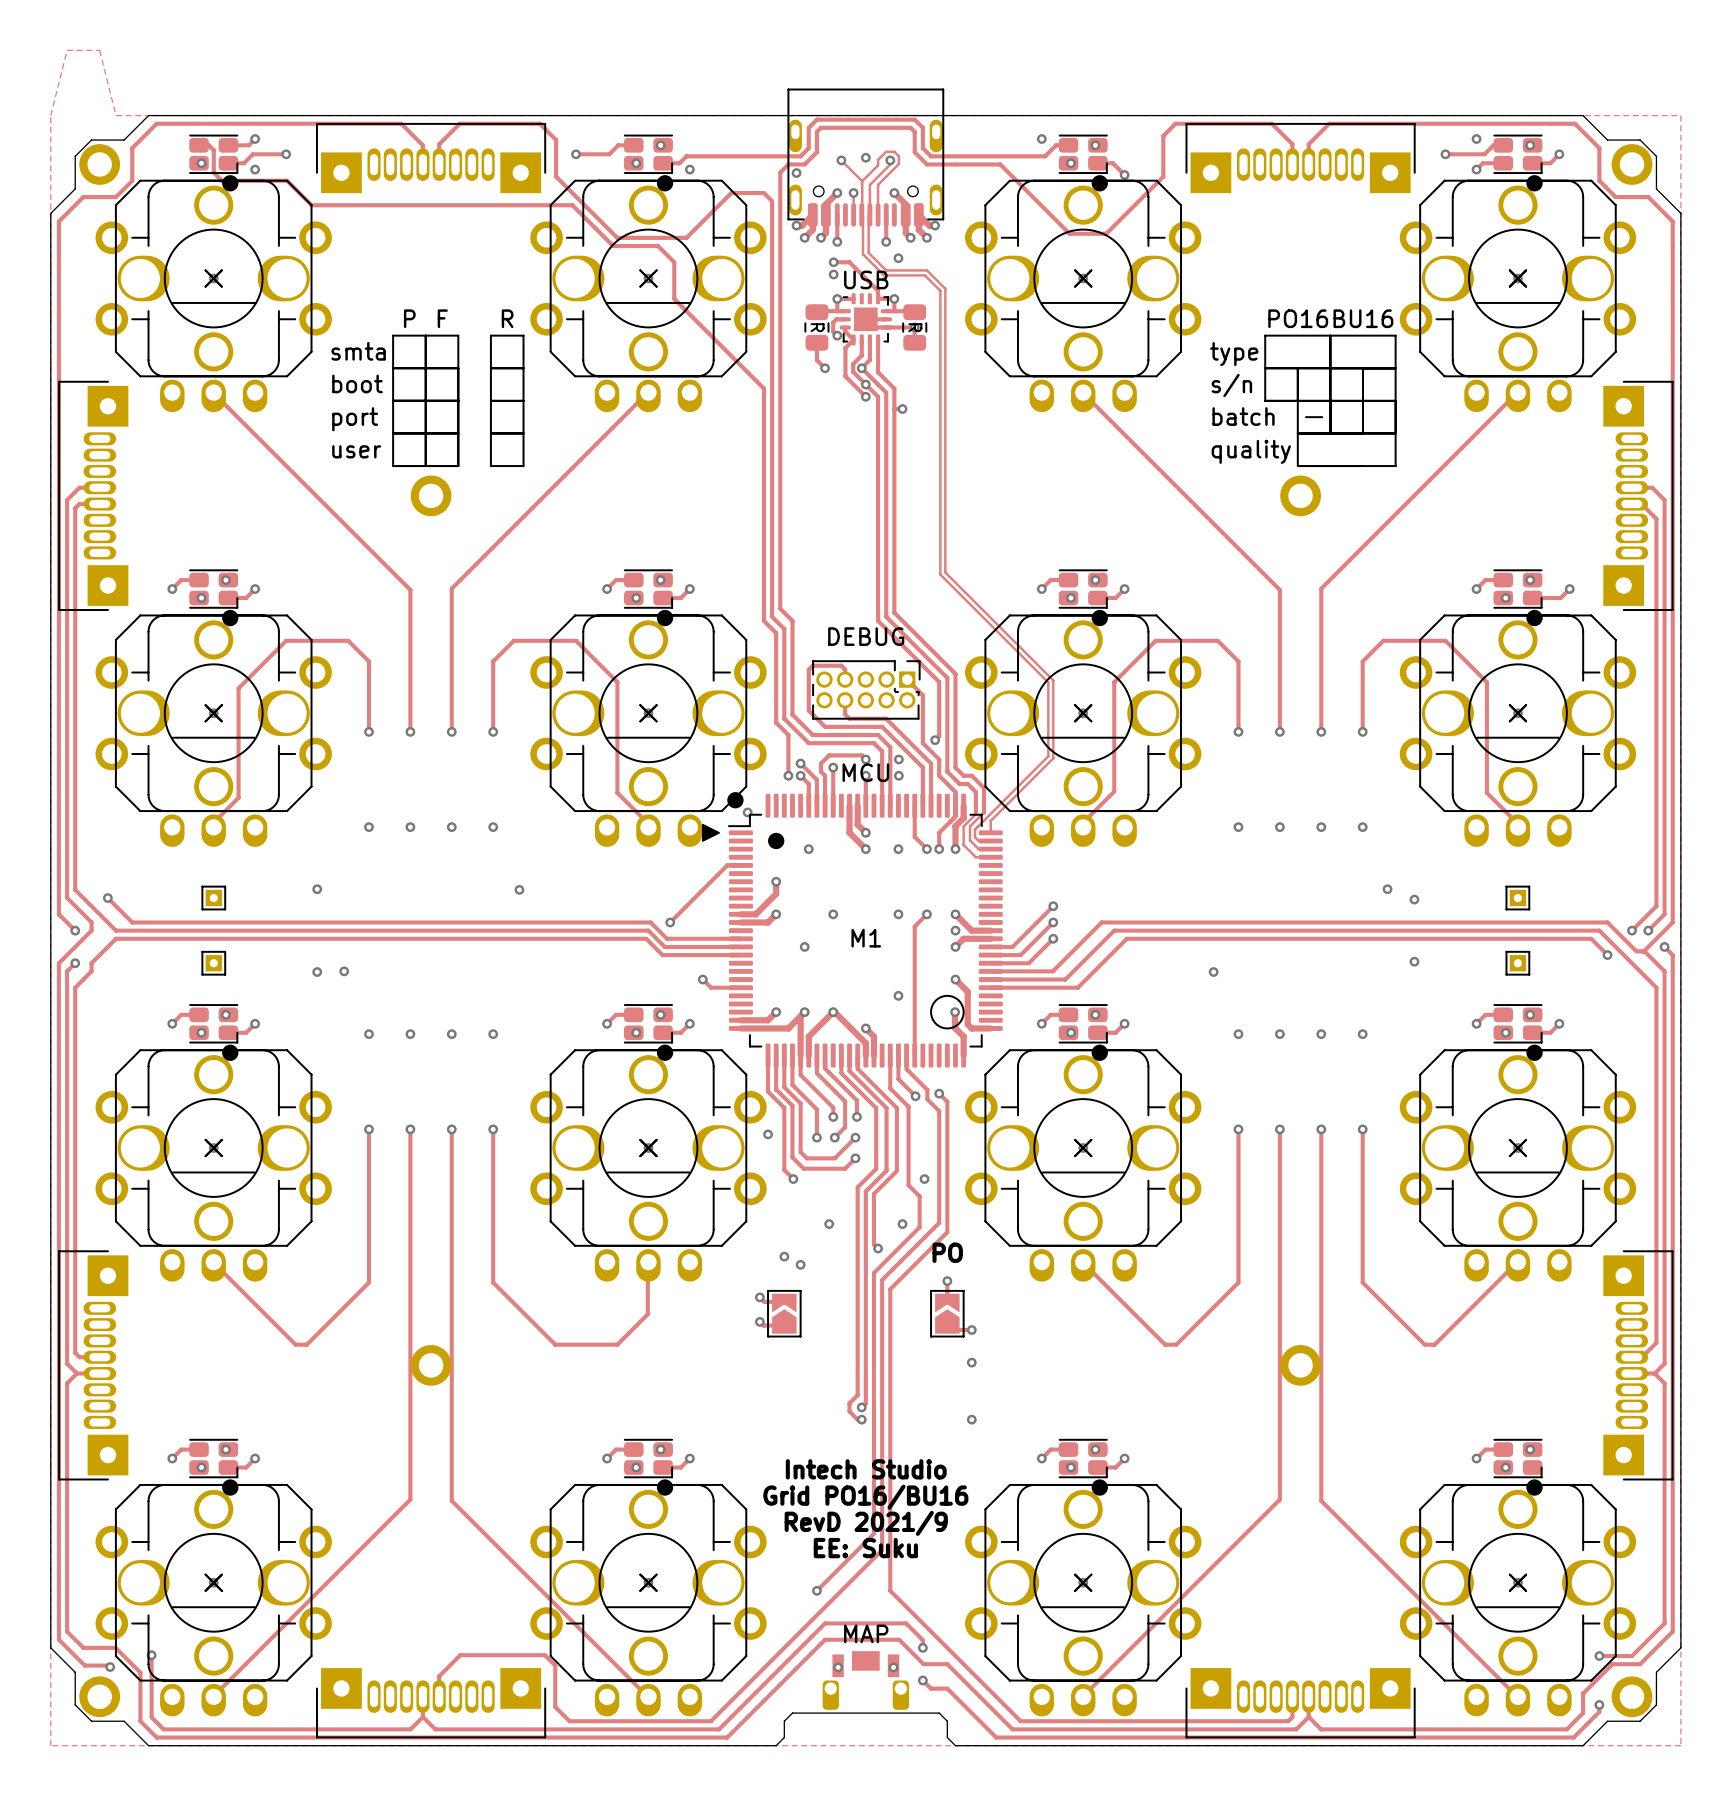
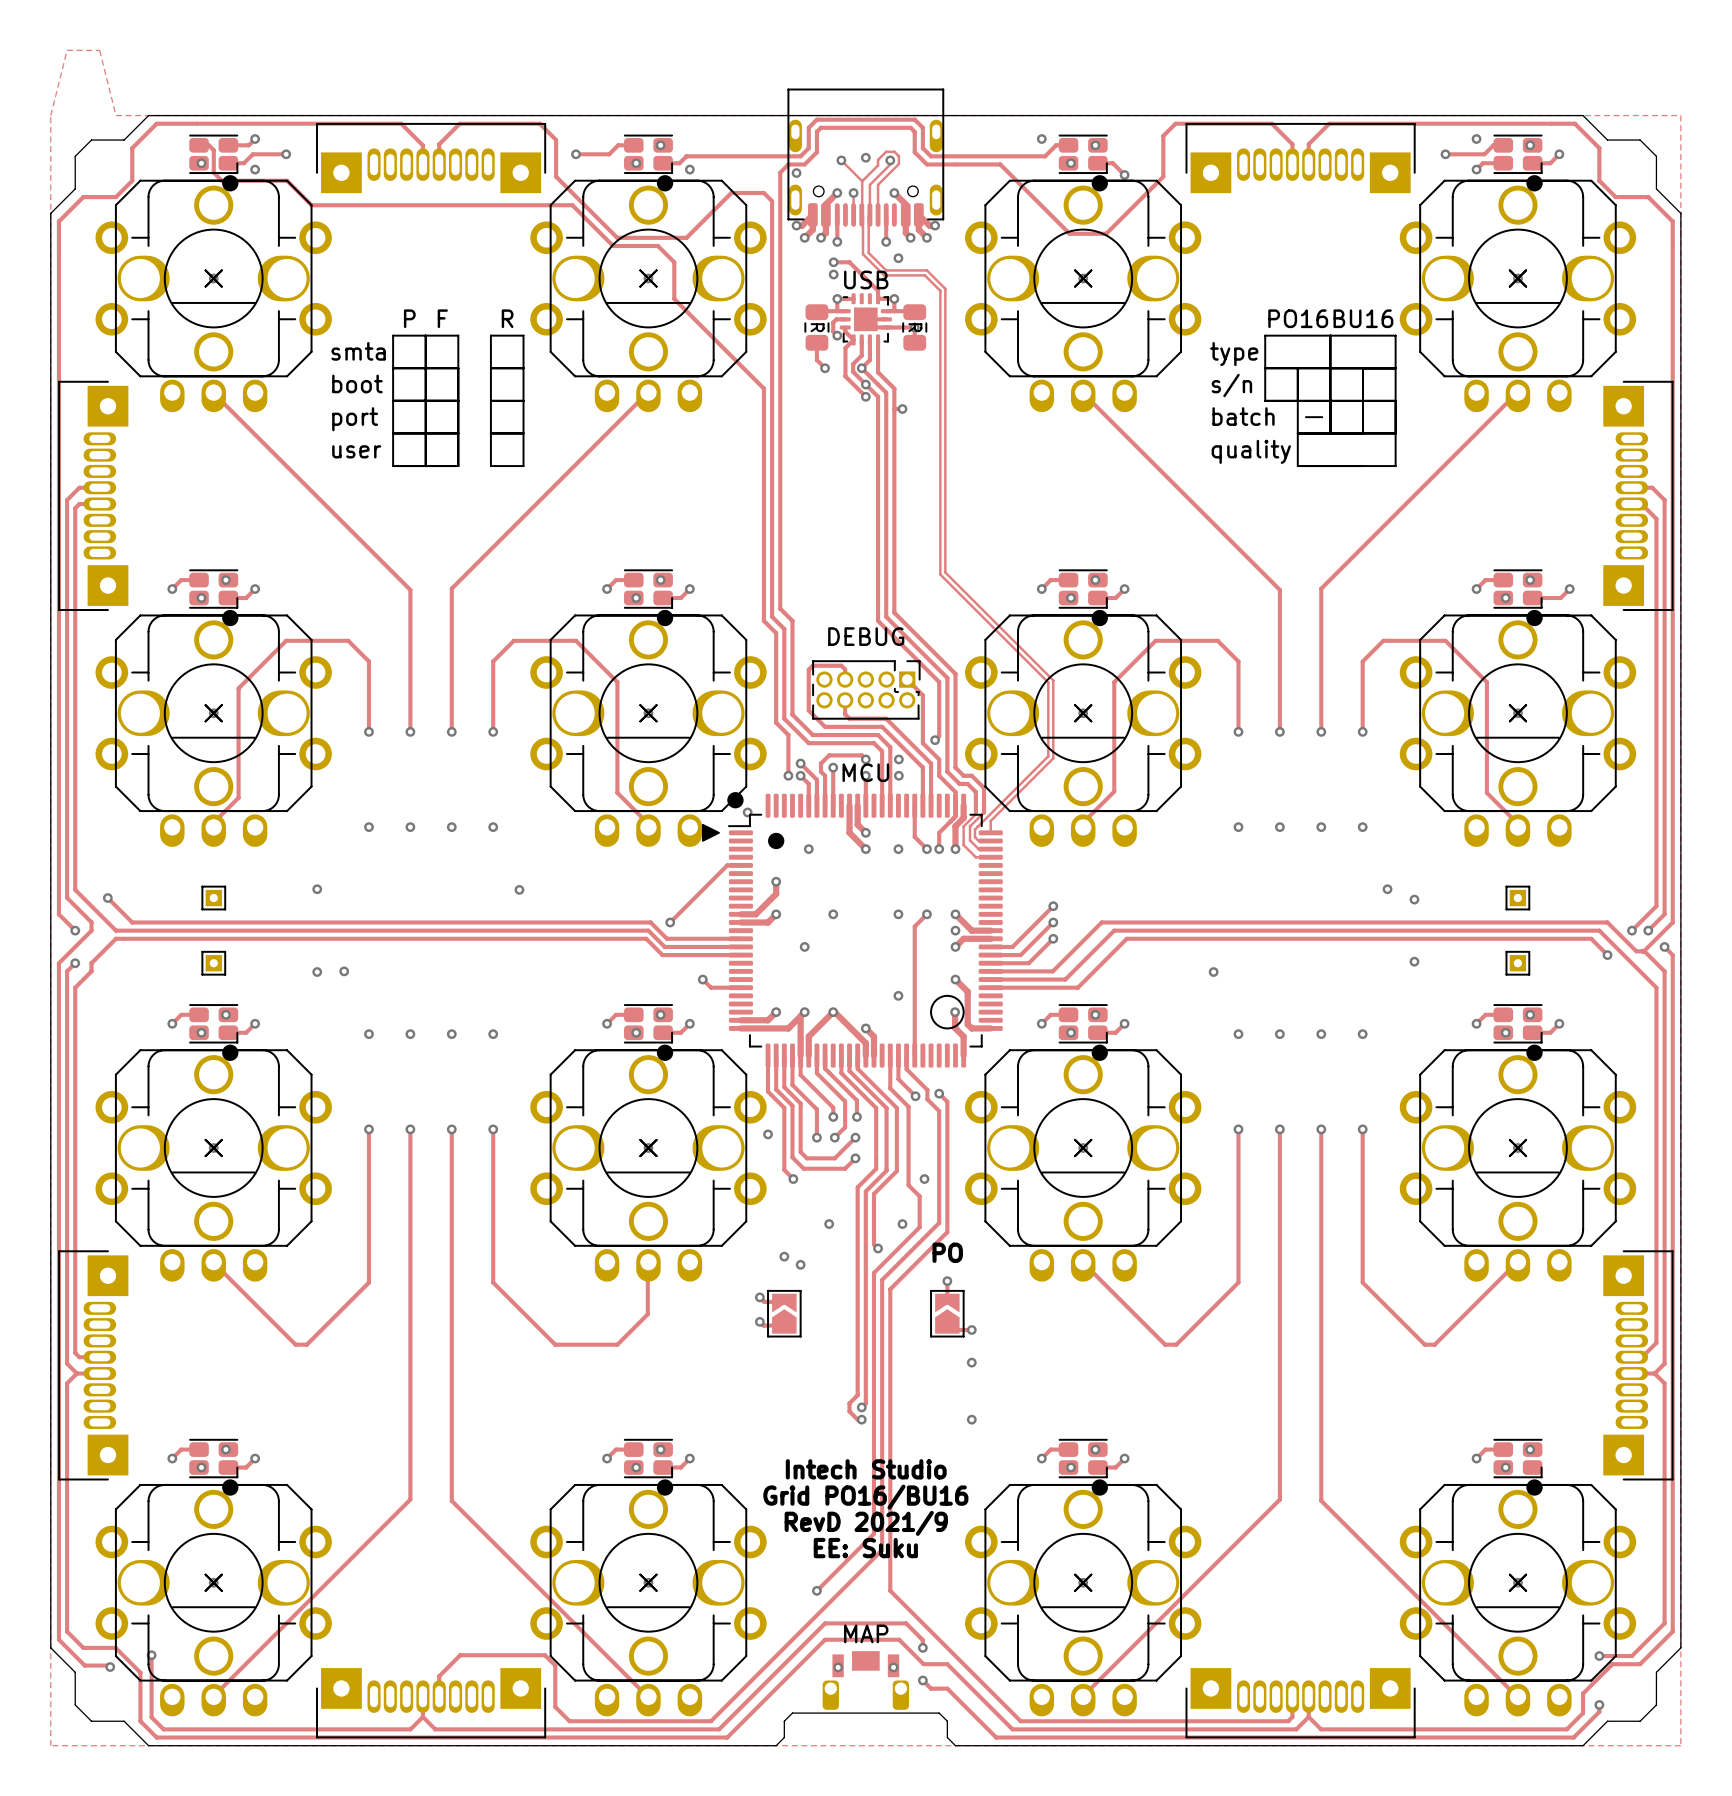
M1: (865, 930) -> none

